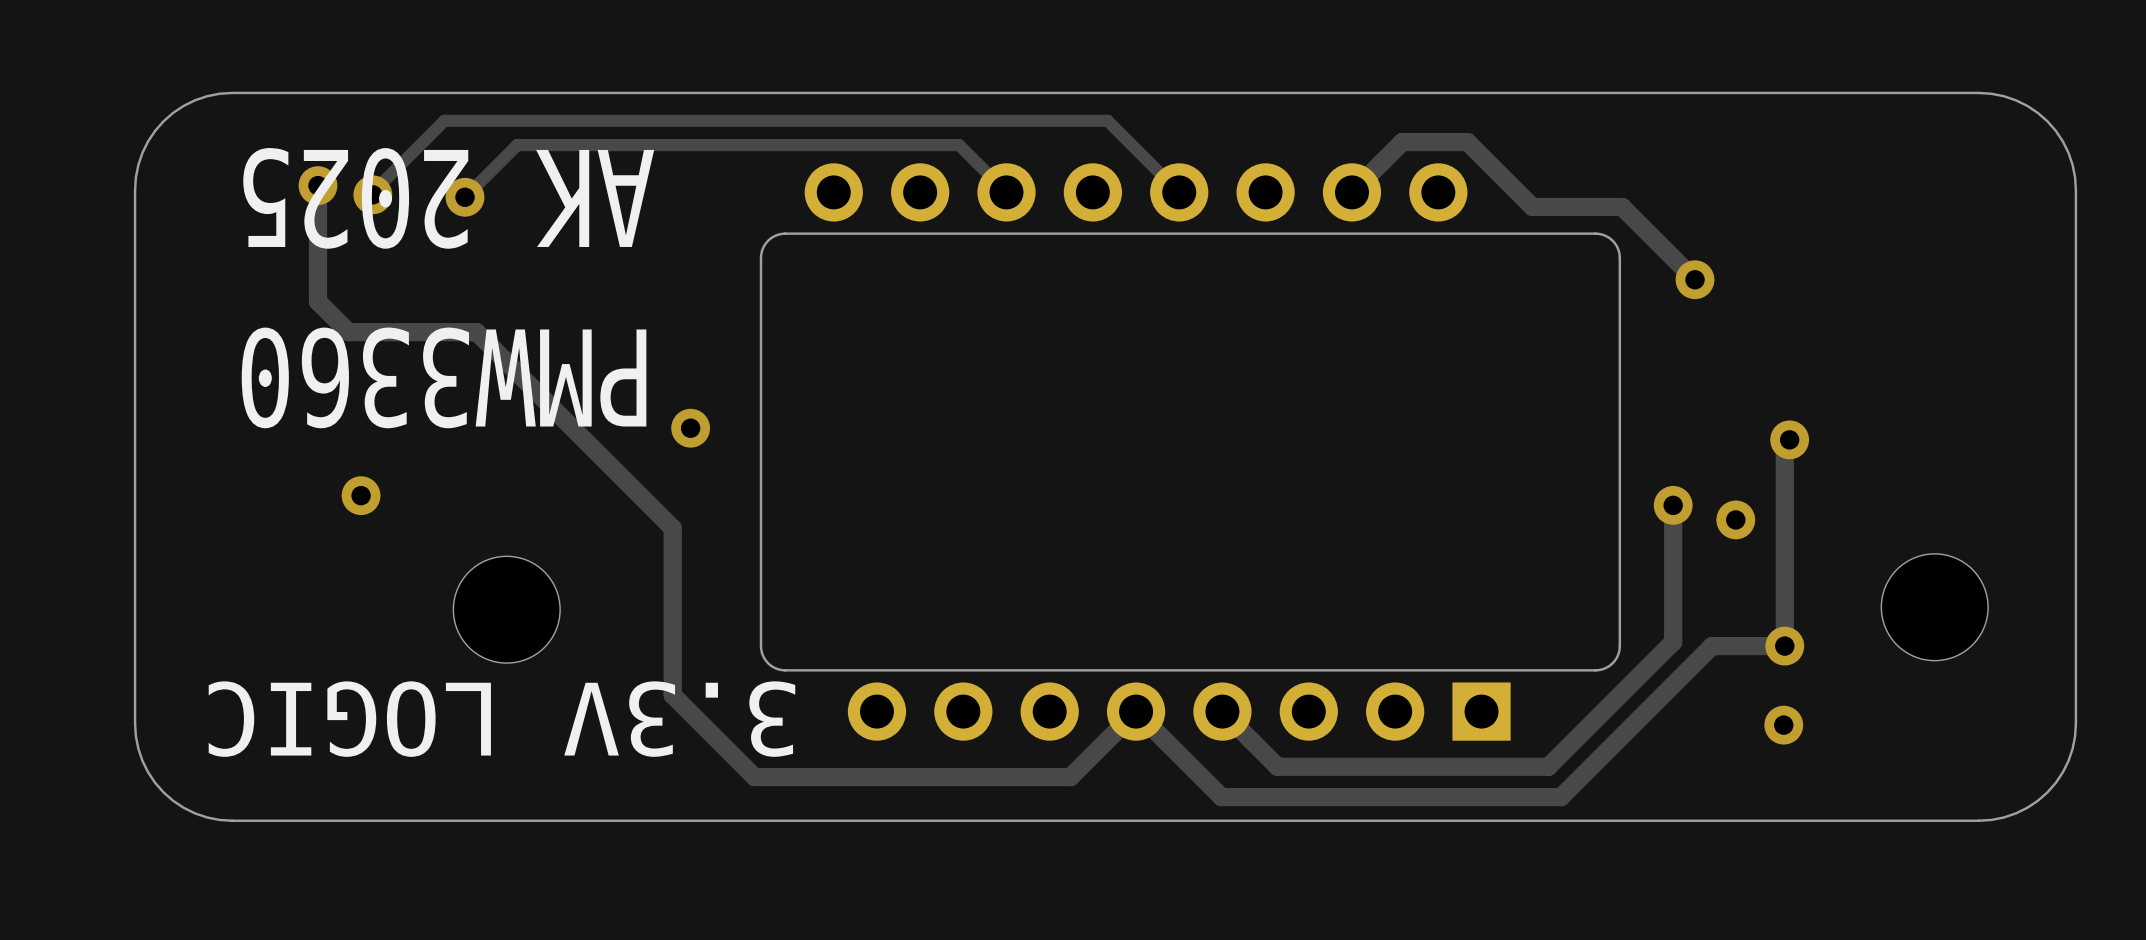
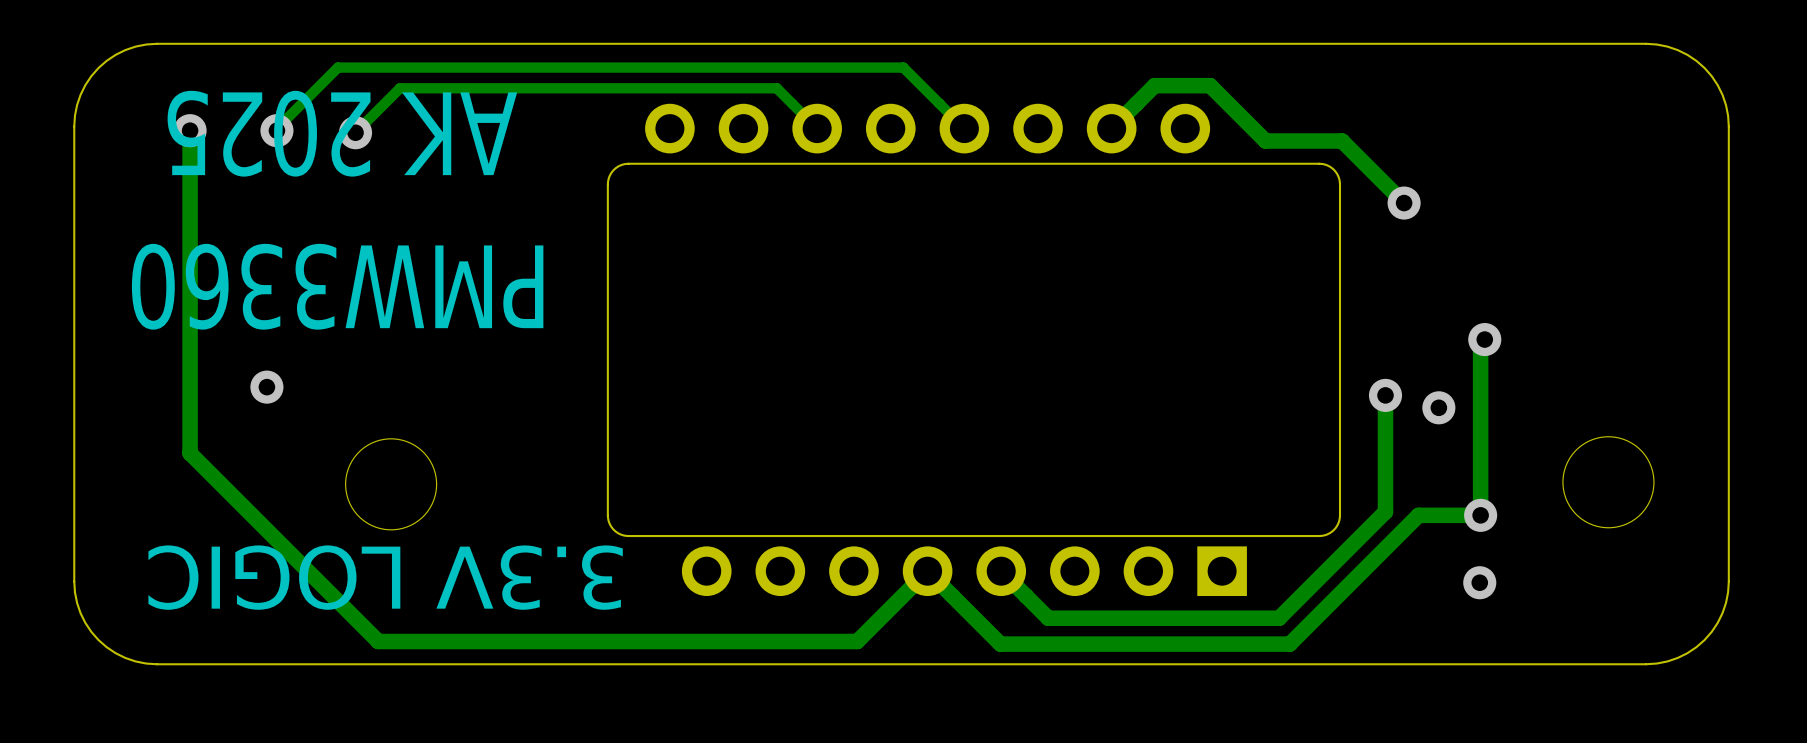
track: (318, 185) (318, 301) (348, 332) (476, 332) (672, 528) (672, 695) (754, 777) (1070, 777) -> (190, 130) (190, 453) (378, 641) (857, 641) (871, 627)
via position: (318, 185) -> (190, 130)
via: (690, 428) -> none

